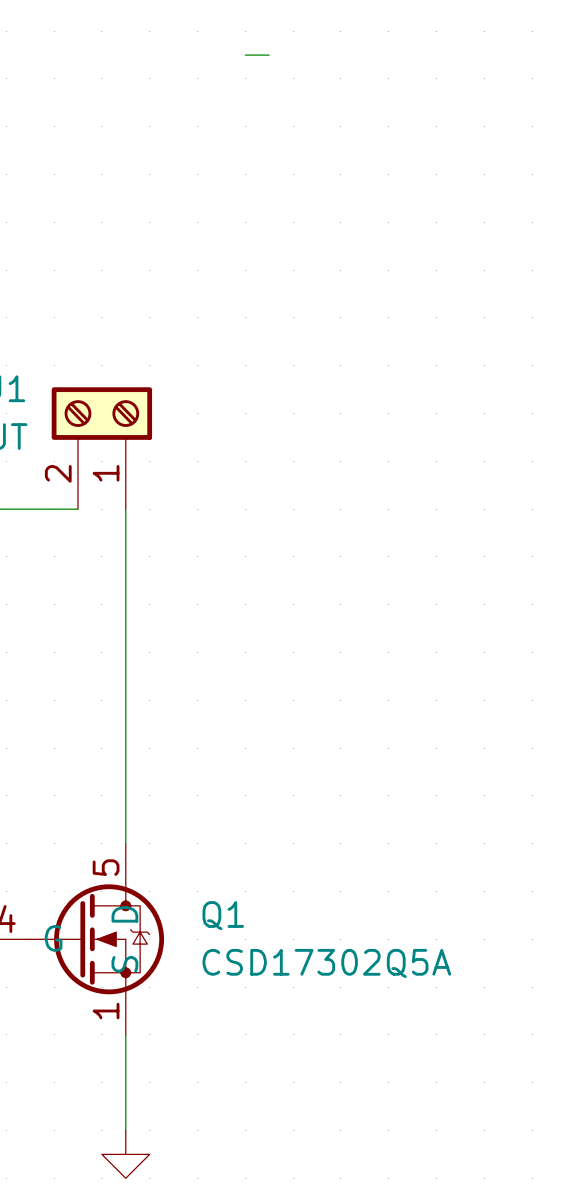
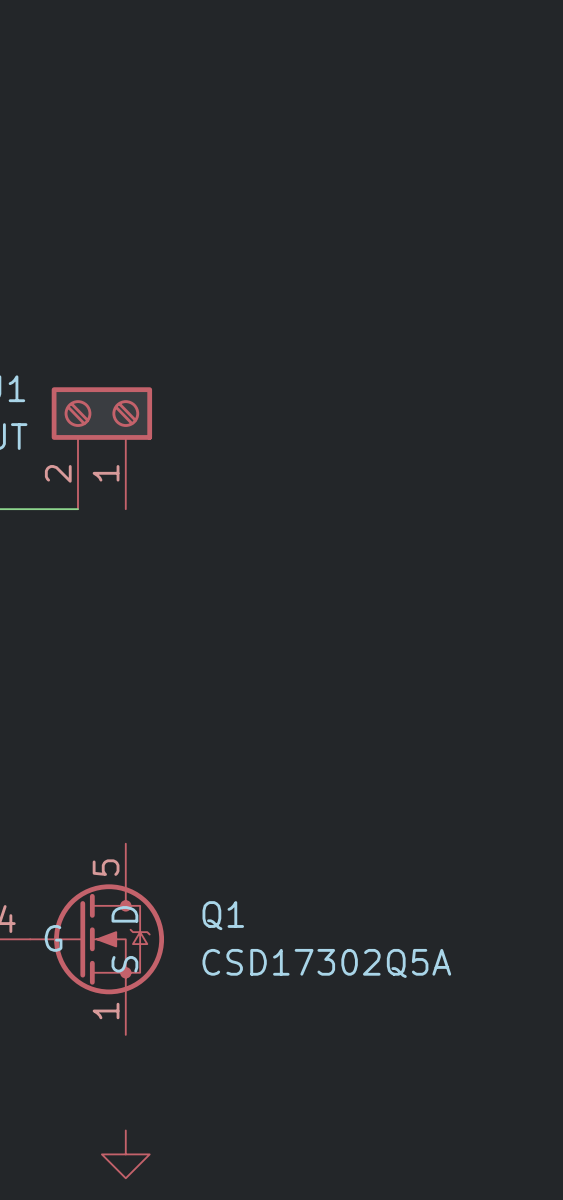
wire: (245, 55) (269, 55) -> none
wire: (125, 509) (125, 843) -> none
wire: (125, 1034) (125, 1130) -> none

